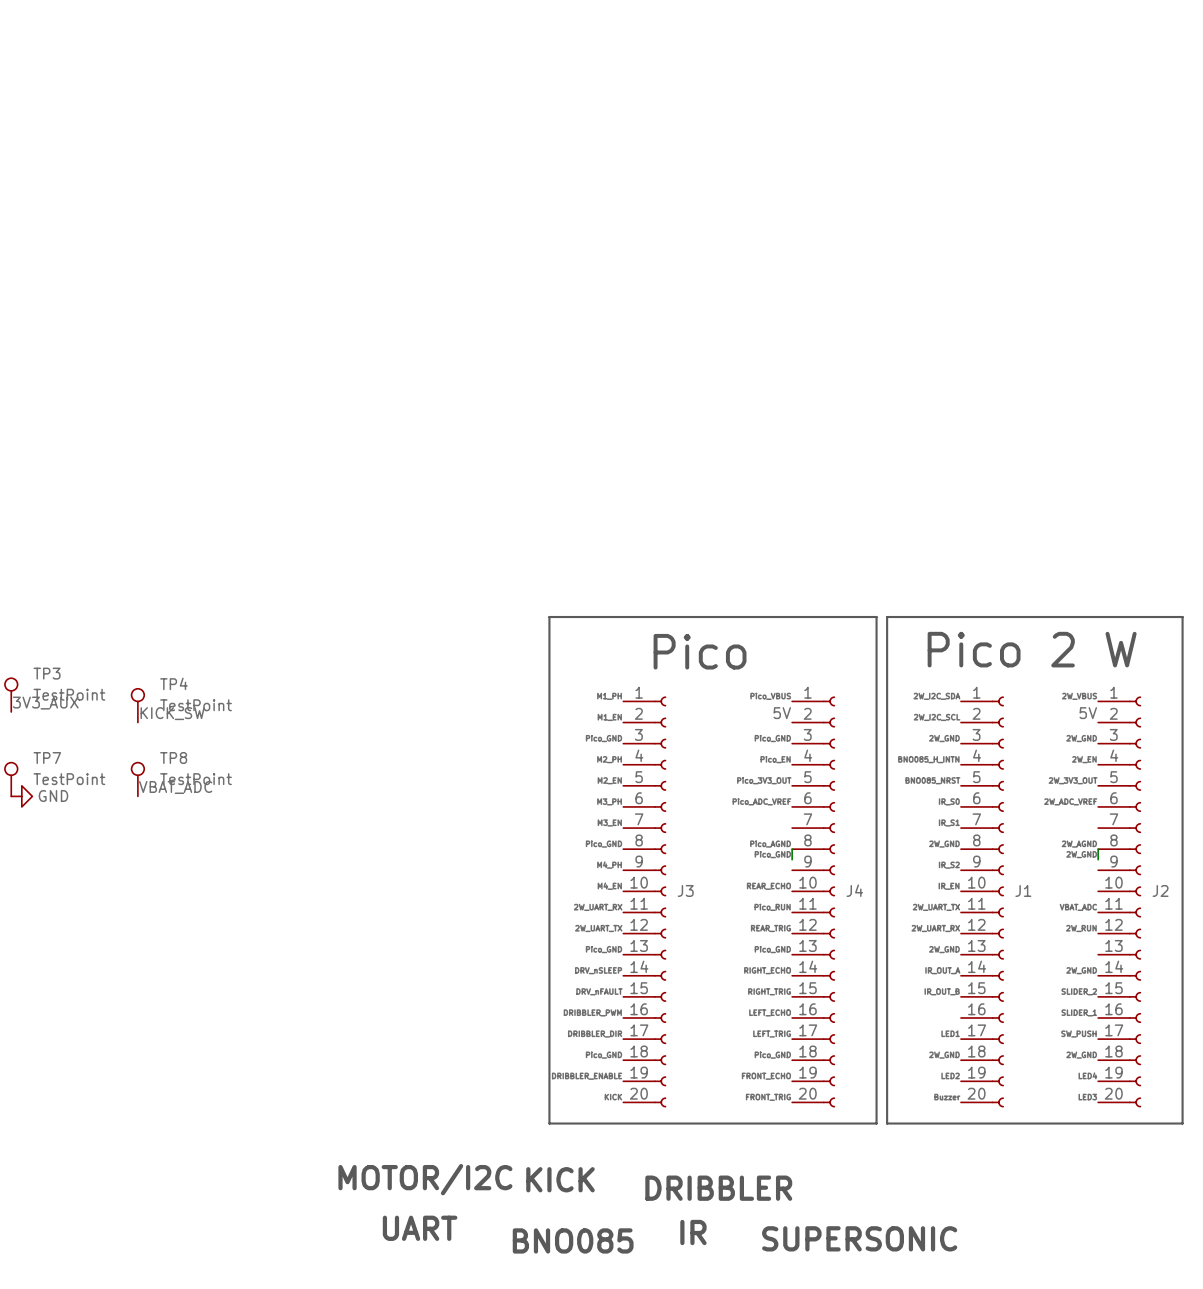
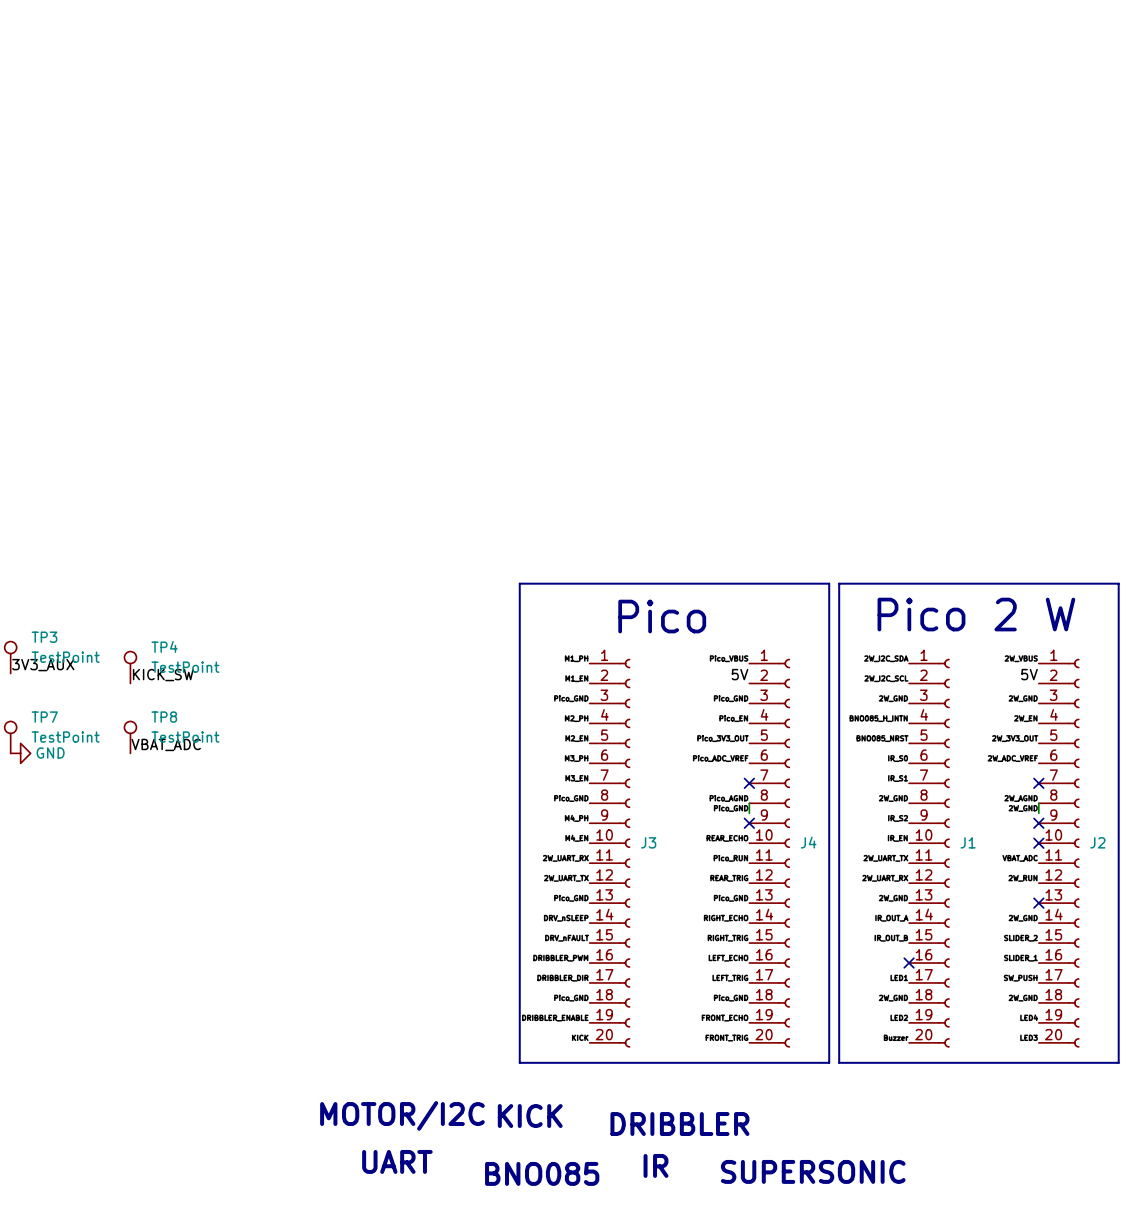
no-connect mark: none -> (749, 783)
no-connect mark: none -> (1038, 783)
no-connect mark: none -> (749, 823)
no-connect mark: none -> (1038, 823)
no-connect mark: none -> (1038, 843)
no-connect mark: none -> (1038, 903)
no-connect mark: none -> (909, 963)

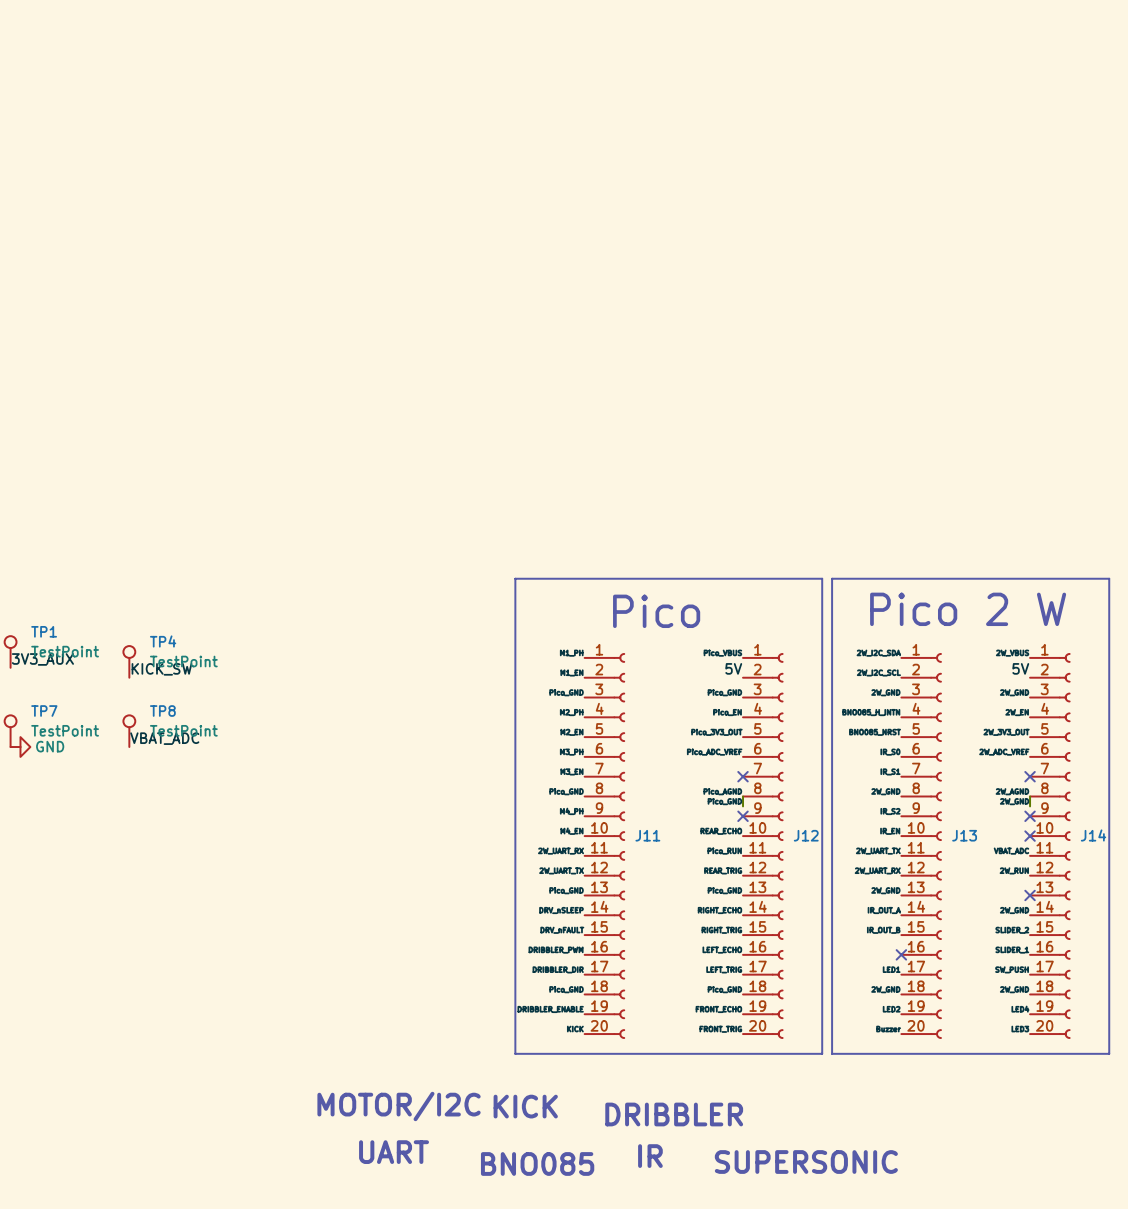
TP3 name: TP3 (44, 637) -> TP1 (44, 631)
J3 name: J3 (648, 842) -> J11 (647, 835)
J4 name: J4 (808, 842) -> J12 (806, 835)
J1 name: J1 (968, 842) -> J13 (964, 835)
J2 name: J2 (1097, 842) -> J14 (1093, 835)

